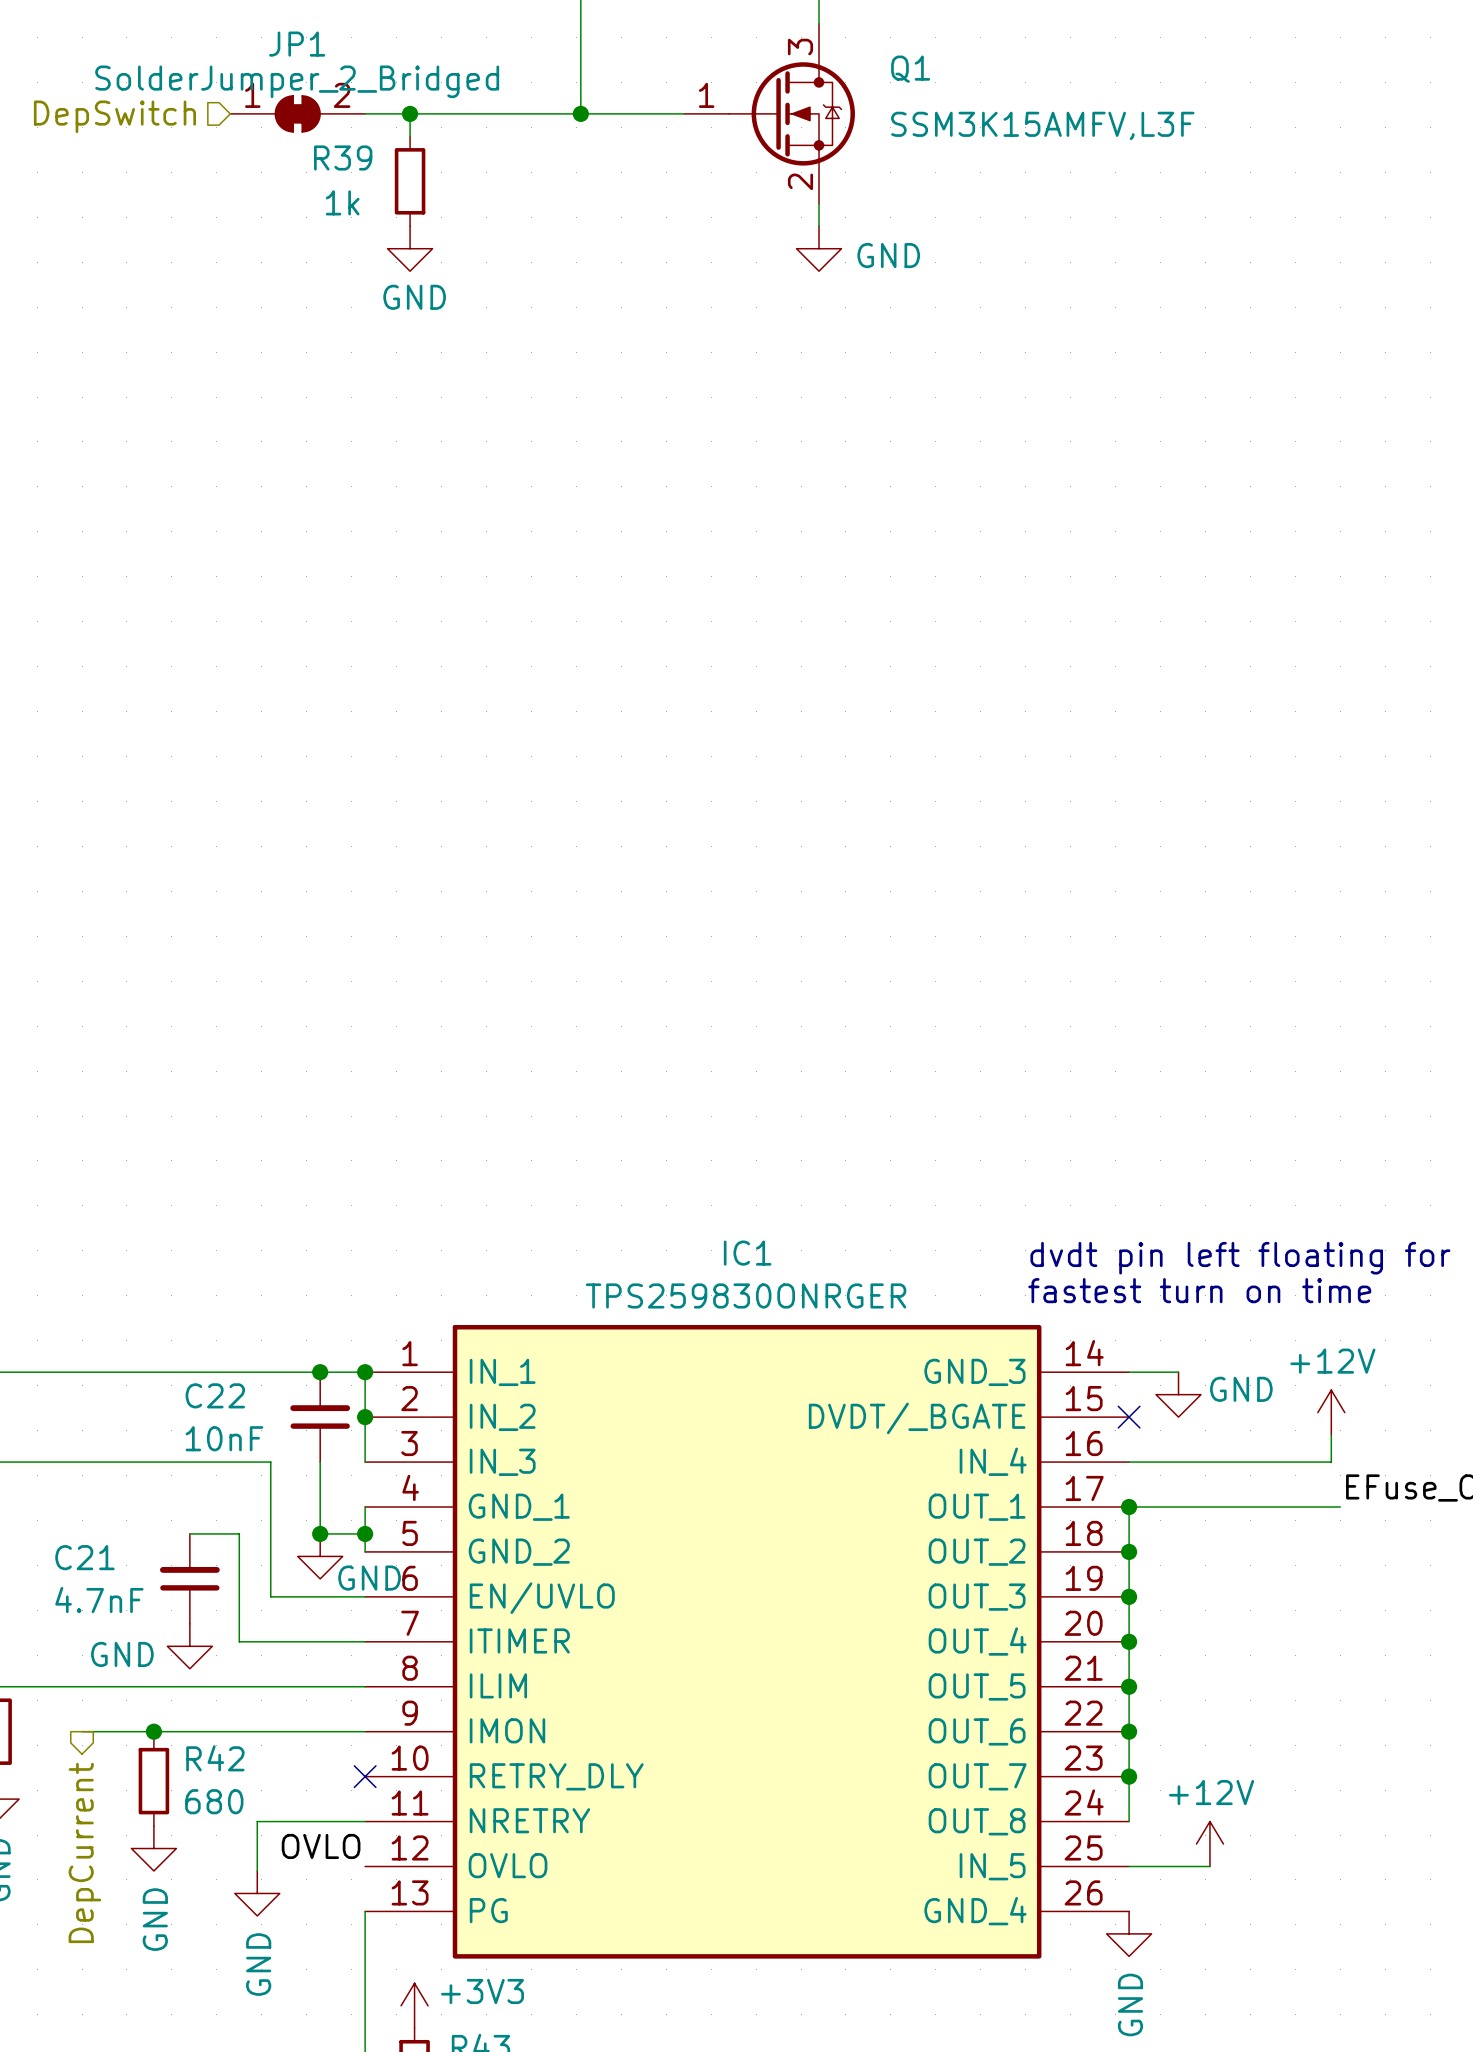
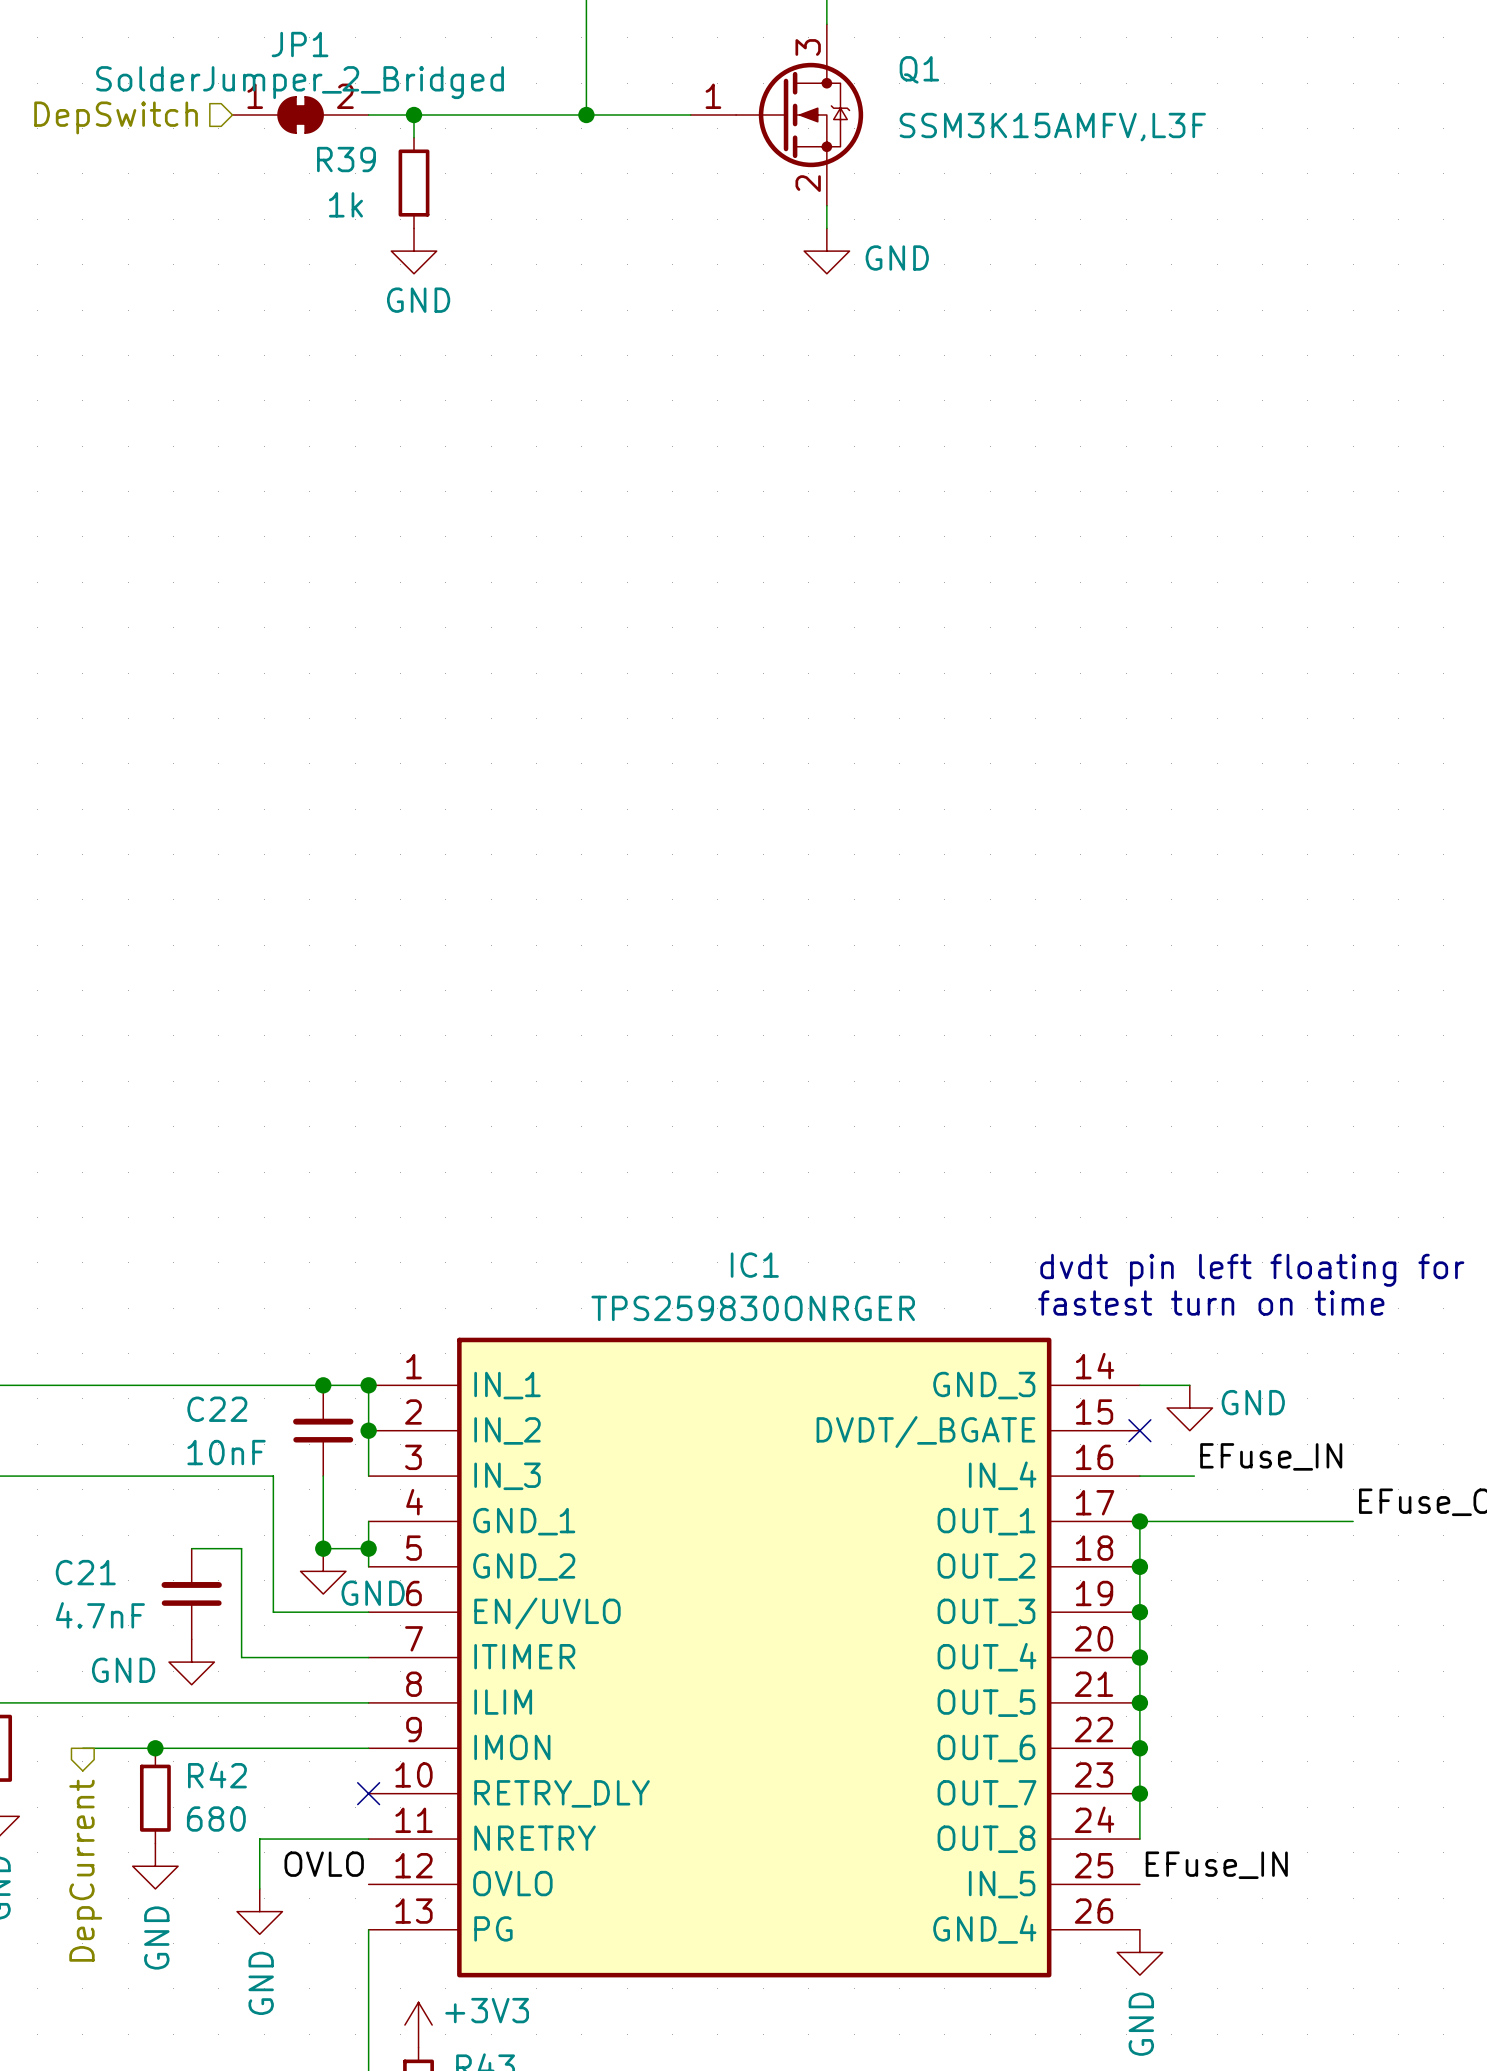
power symbol: +12V (1331, 1412) -> none
wire: (1331, 1435) (1331, 1462) (1183, 1462) -> none
label: none -> EFuse_IN (1271, 1456)
power symbol: +12V (1209, 1844) -> none
label: none -> EFuse_IN (1216, 1865)
wire: (1129, 1866) (1209, 1866) -> none

